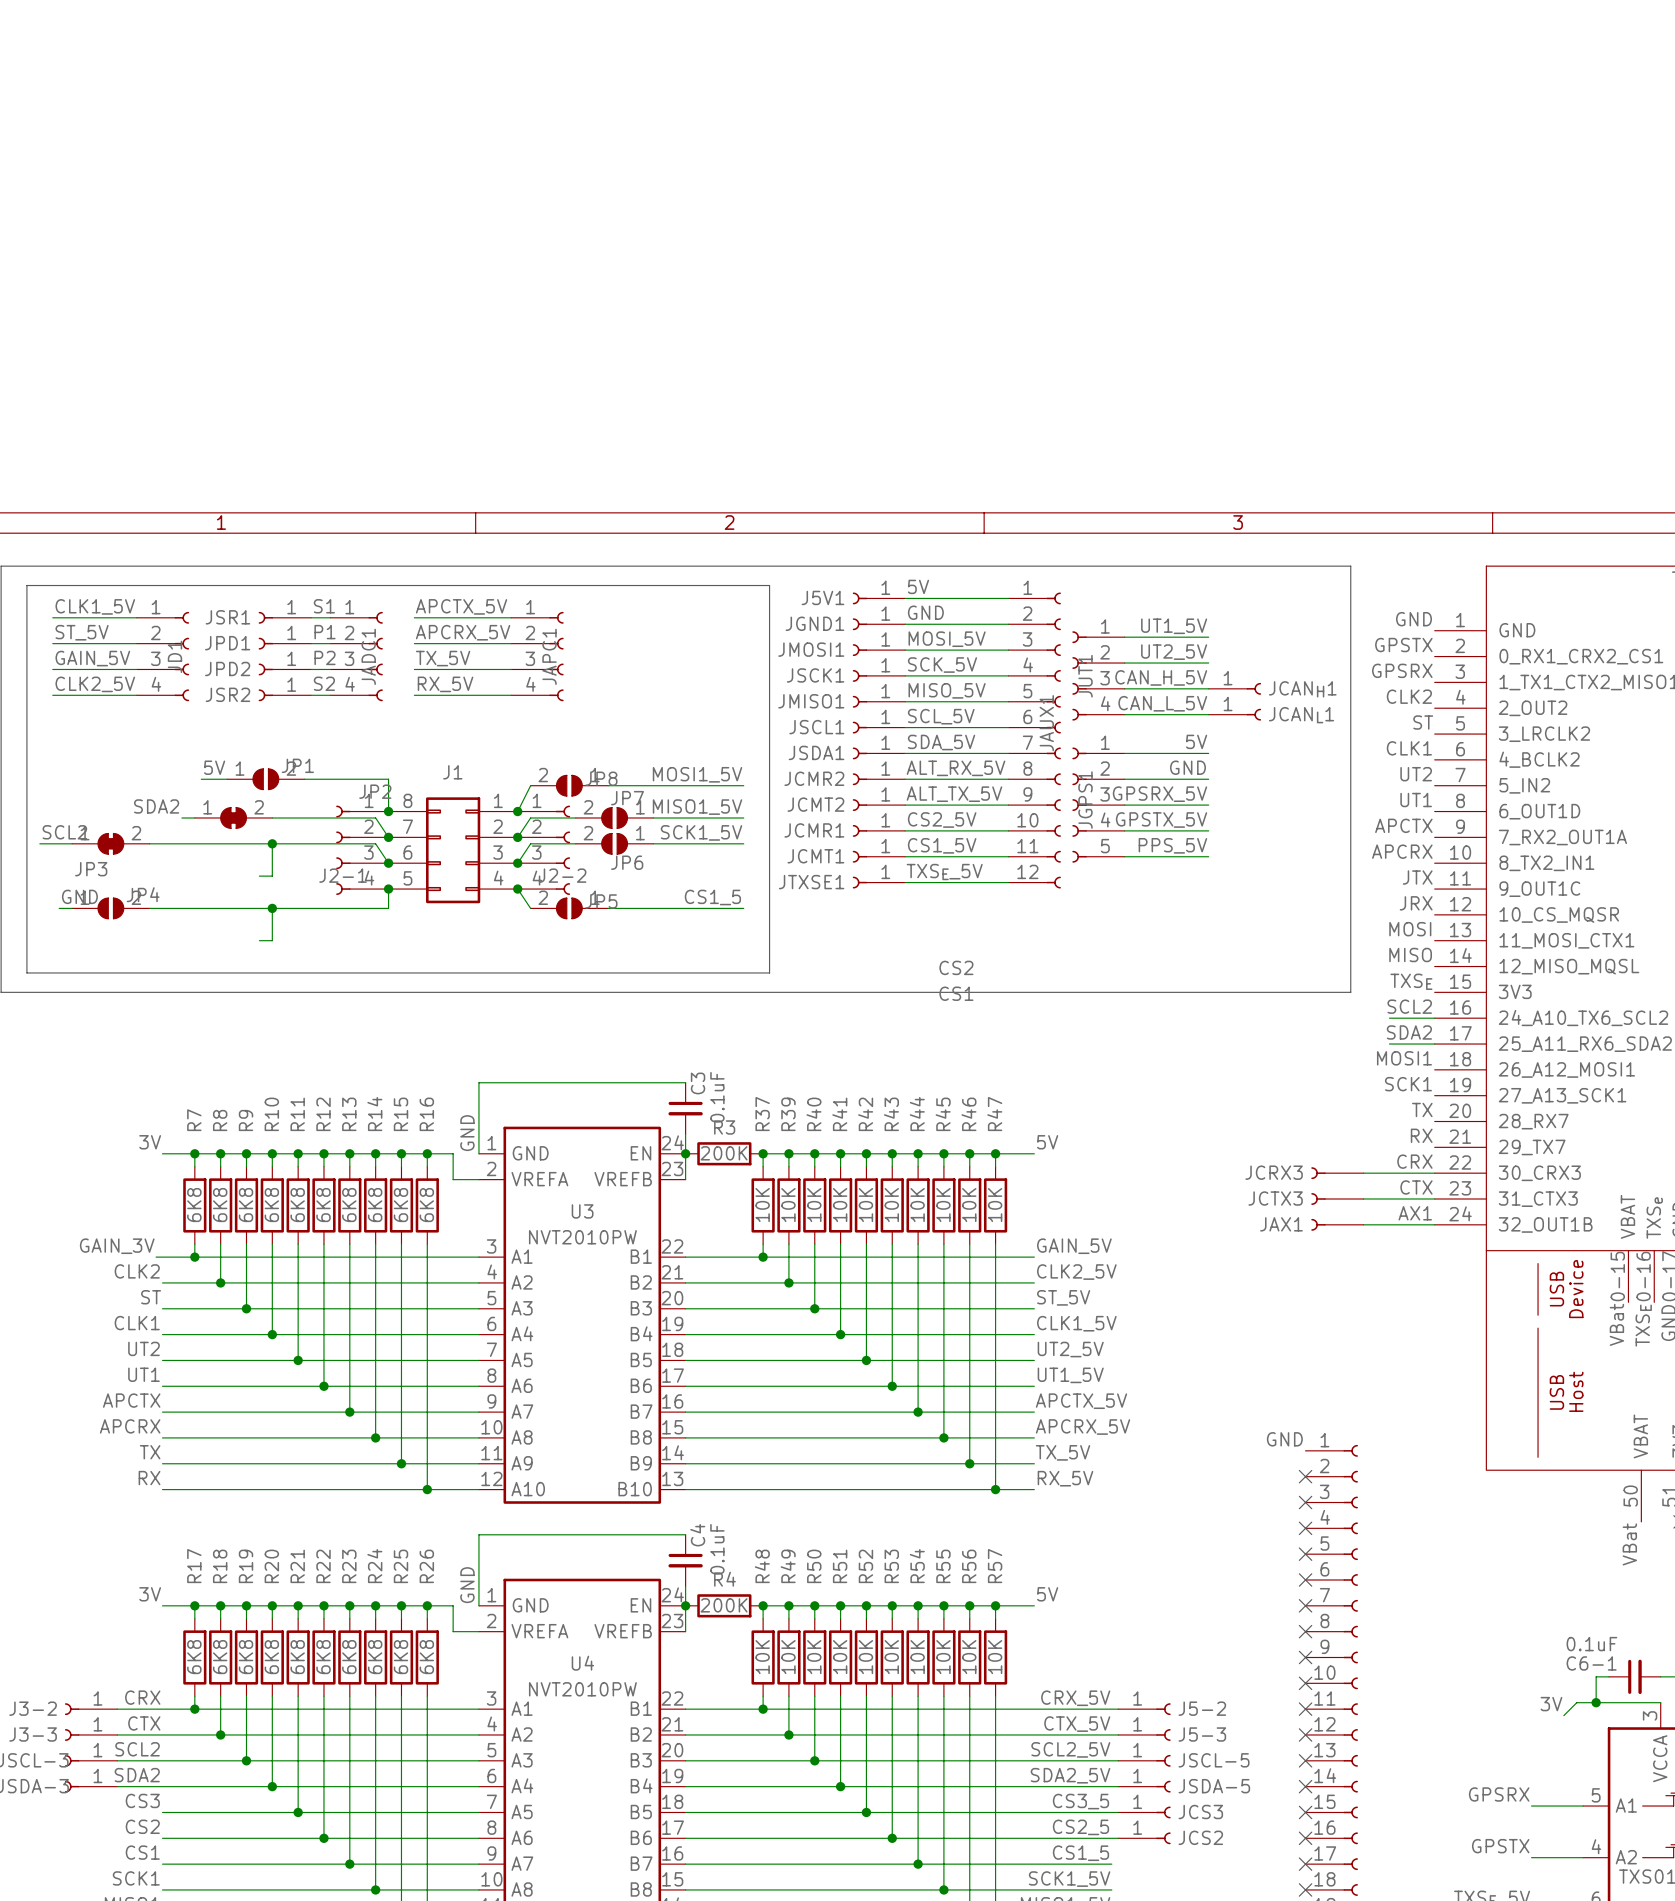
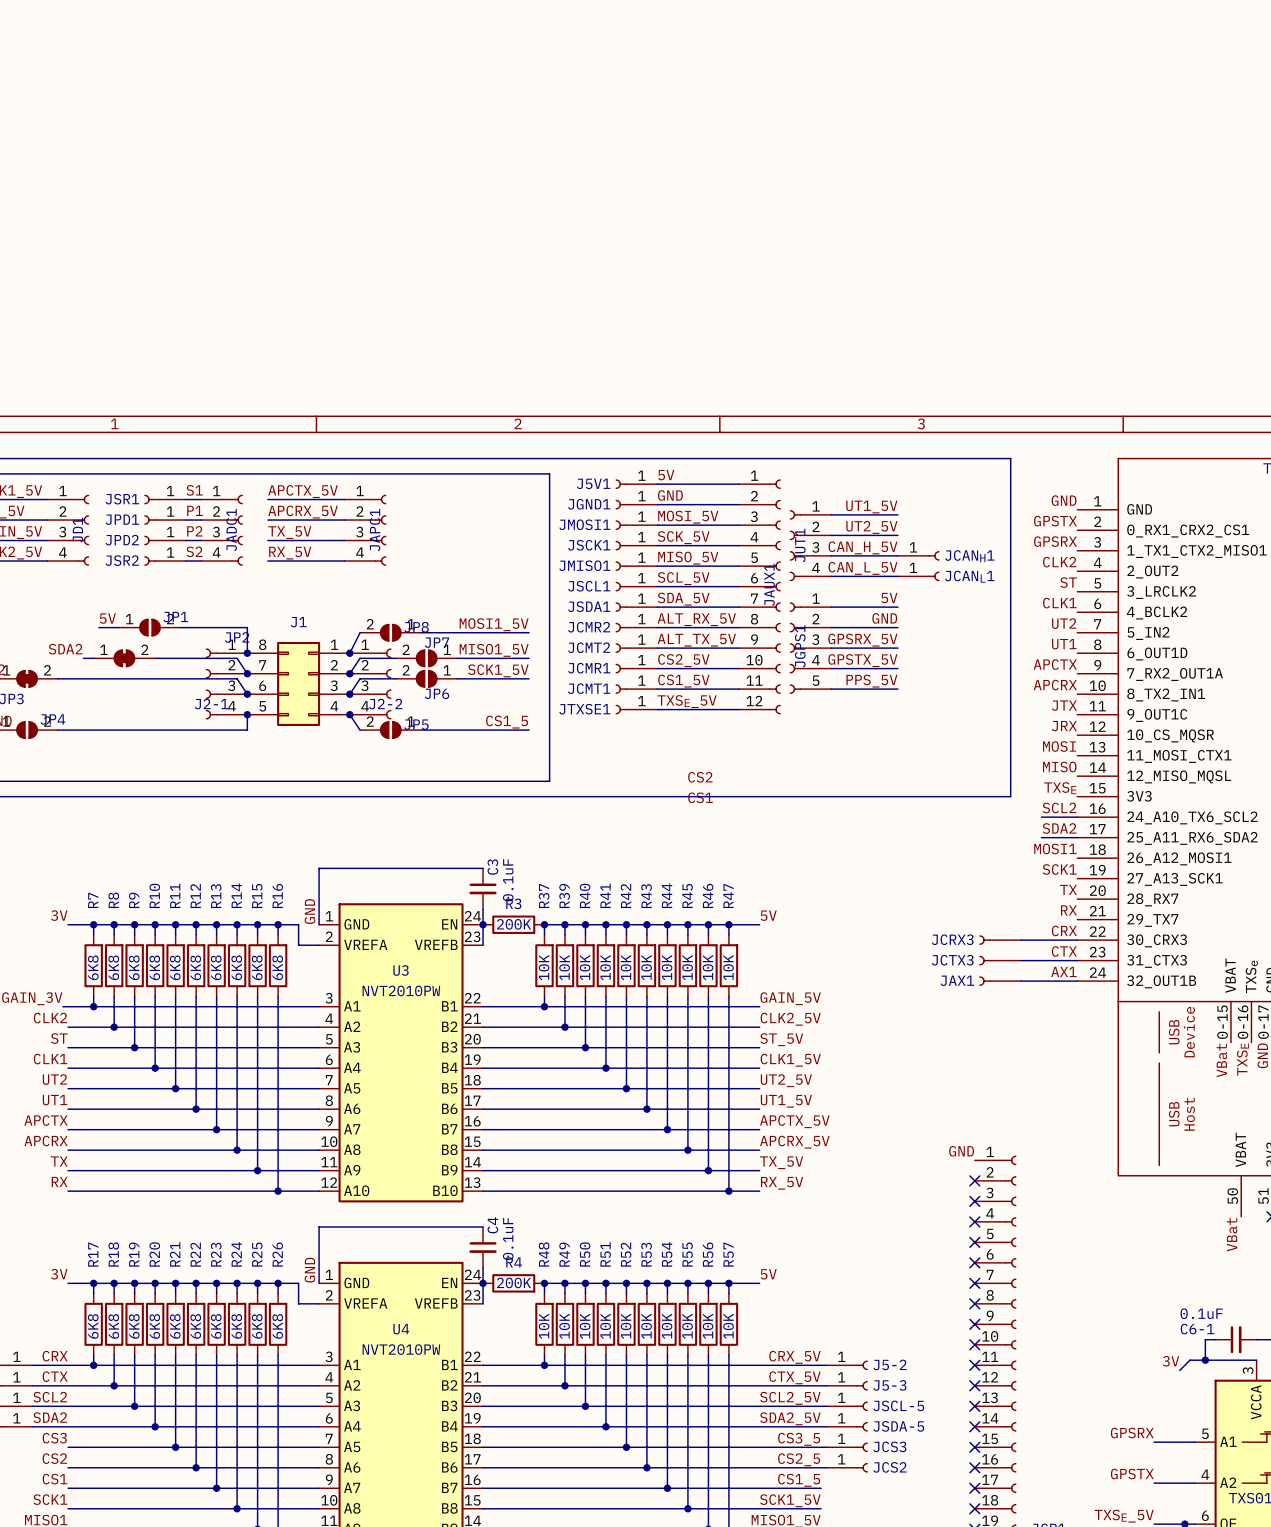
wire: (272, 843) (272, 876) (259, 876) -> none
junction: (272, 843) -> none
wire: (272, 908) (272, 940) (259, 940) -> none
junction: (272, 908) -> none

